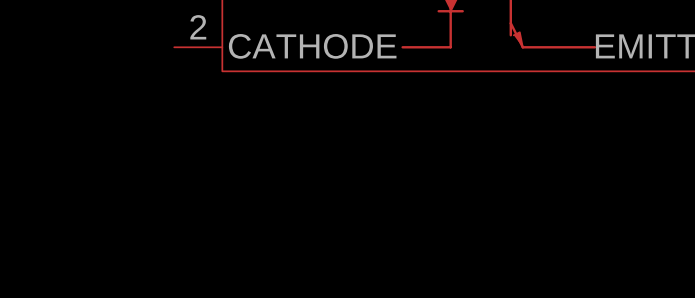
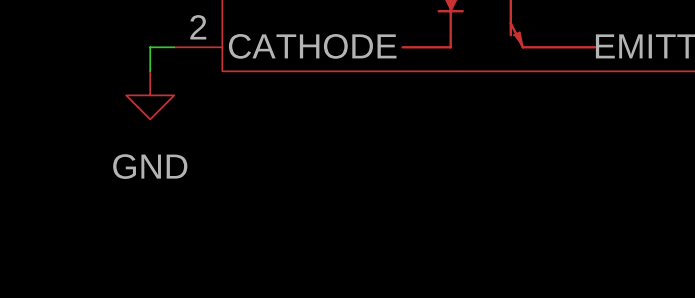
wire: none -> (174, 47) (150, 47) (150, 71)
power symbol: none -> GND (150, 95)

